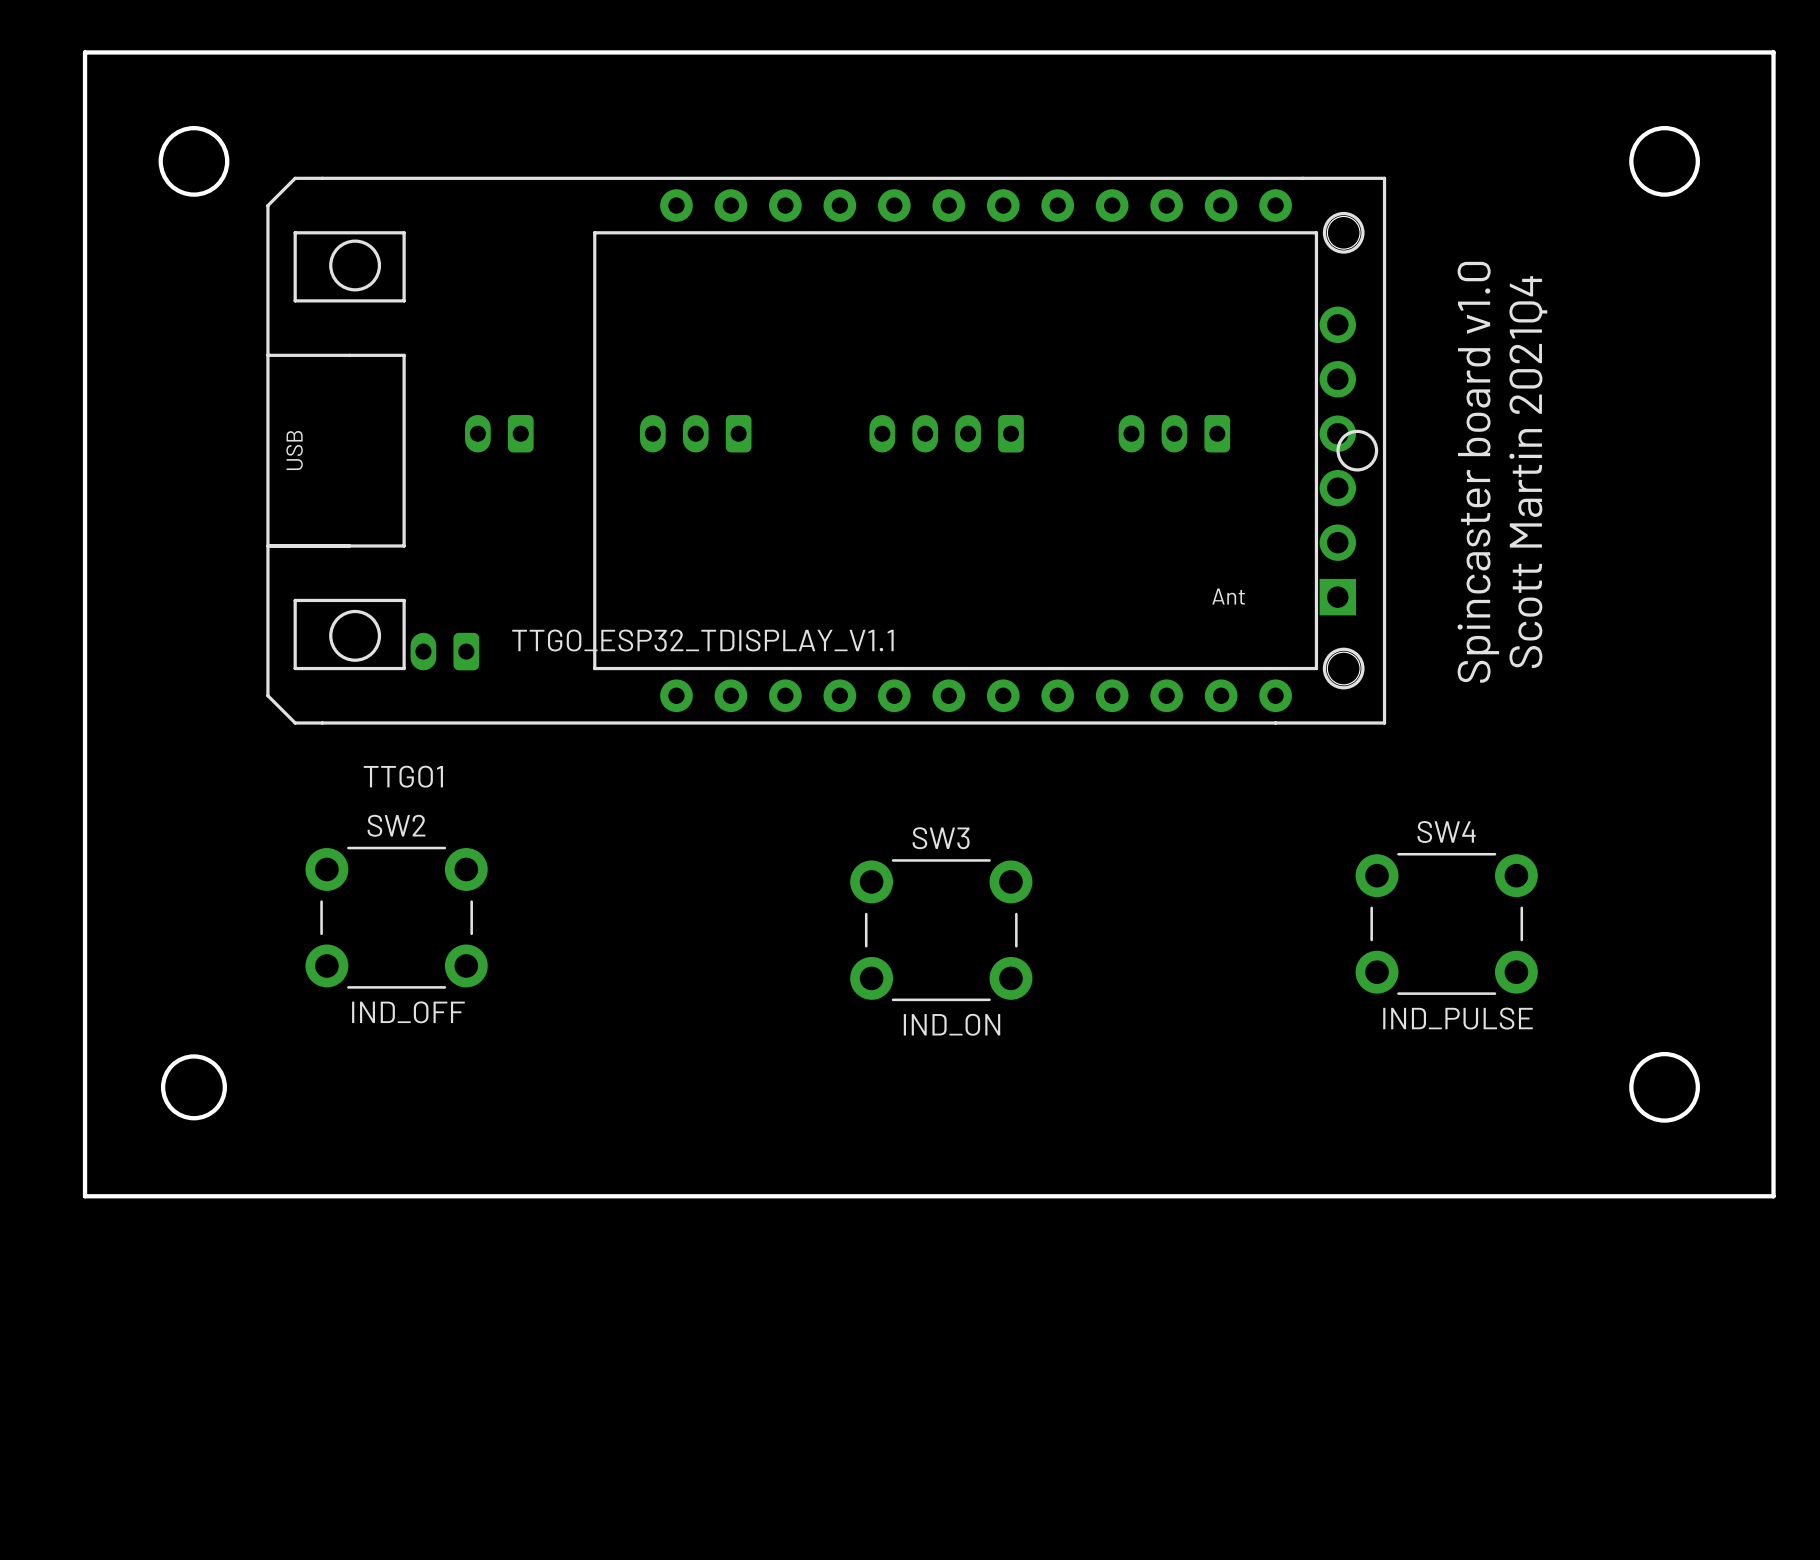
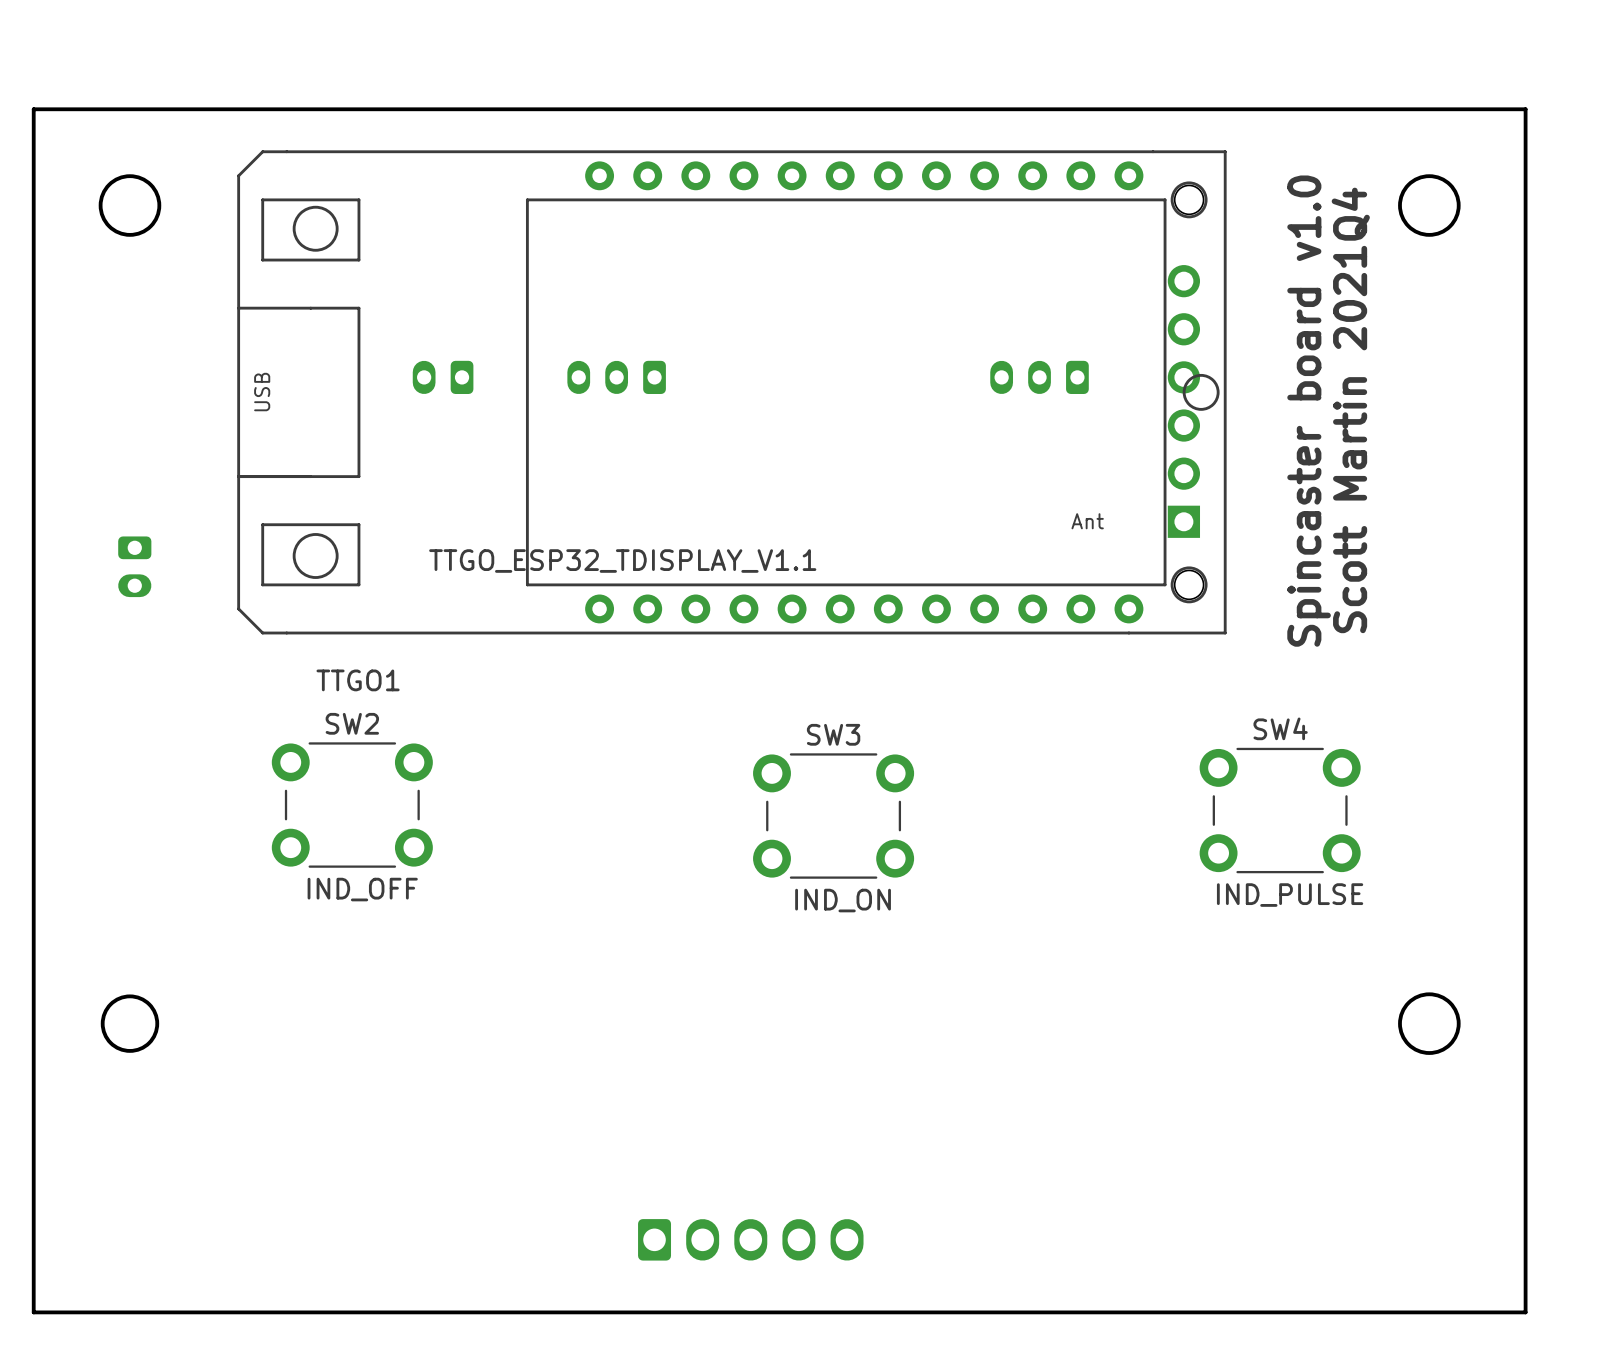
board edge: (85, 52) (1773, 52) (1773, 1196) (85, 1196) (85, 52) -> (33, 109) (33, 1312) (1525, 1312) (1525, 109) (33, 109)
round board edge position: (193, 161) -> (129, 205)
round board edge position: (1664, 161) -> (1429, 205)
part: (946, 433) -> none
part rotation: 0° (444, 651) -> 90° counterclockwise (134, 566)
part position: (444, 651) -> (134, 566)
round board edge position: (193, 1087) -> (129, 1023)
round board edge position: (1664, 1087) -> (1429, 1023)
part: none -> (750, 1239)

